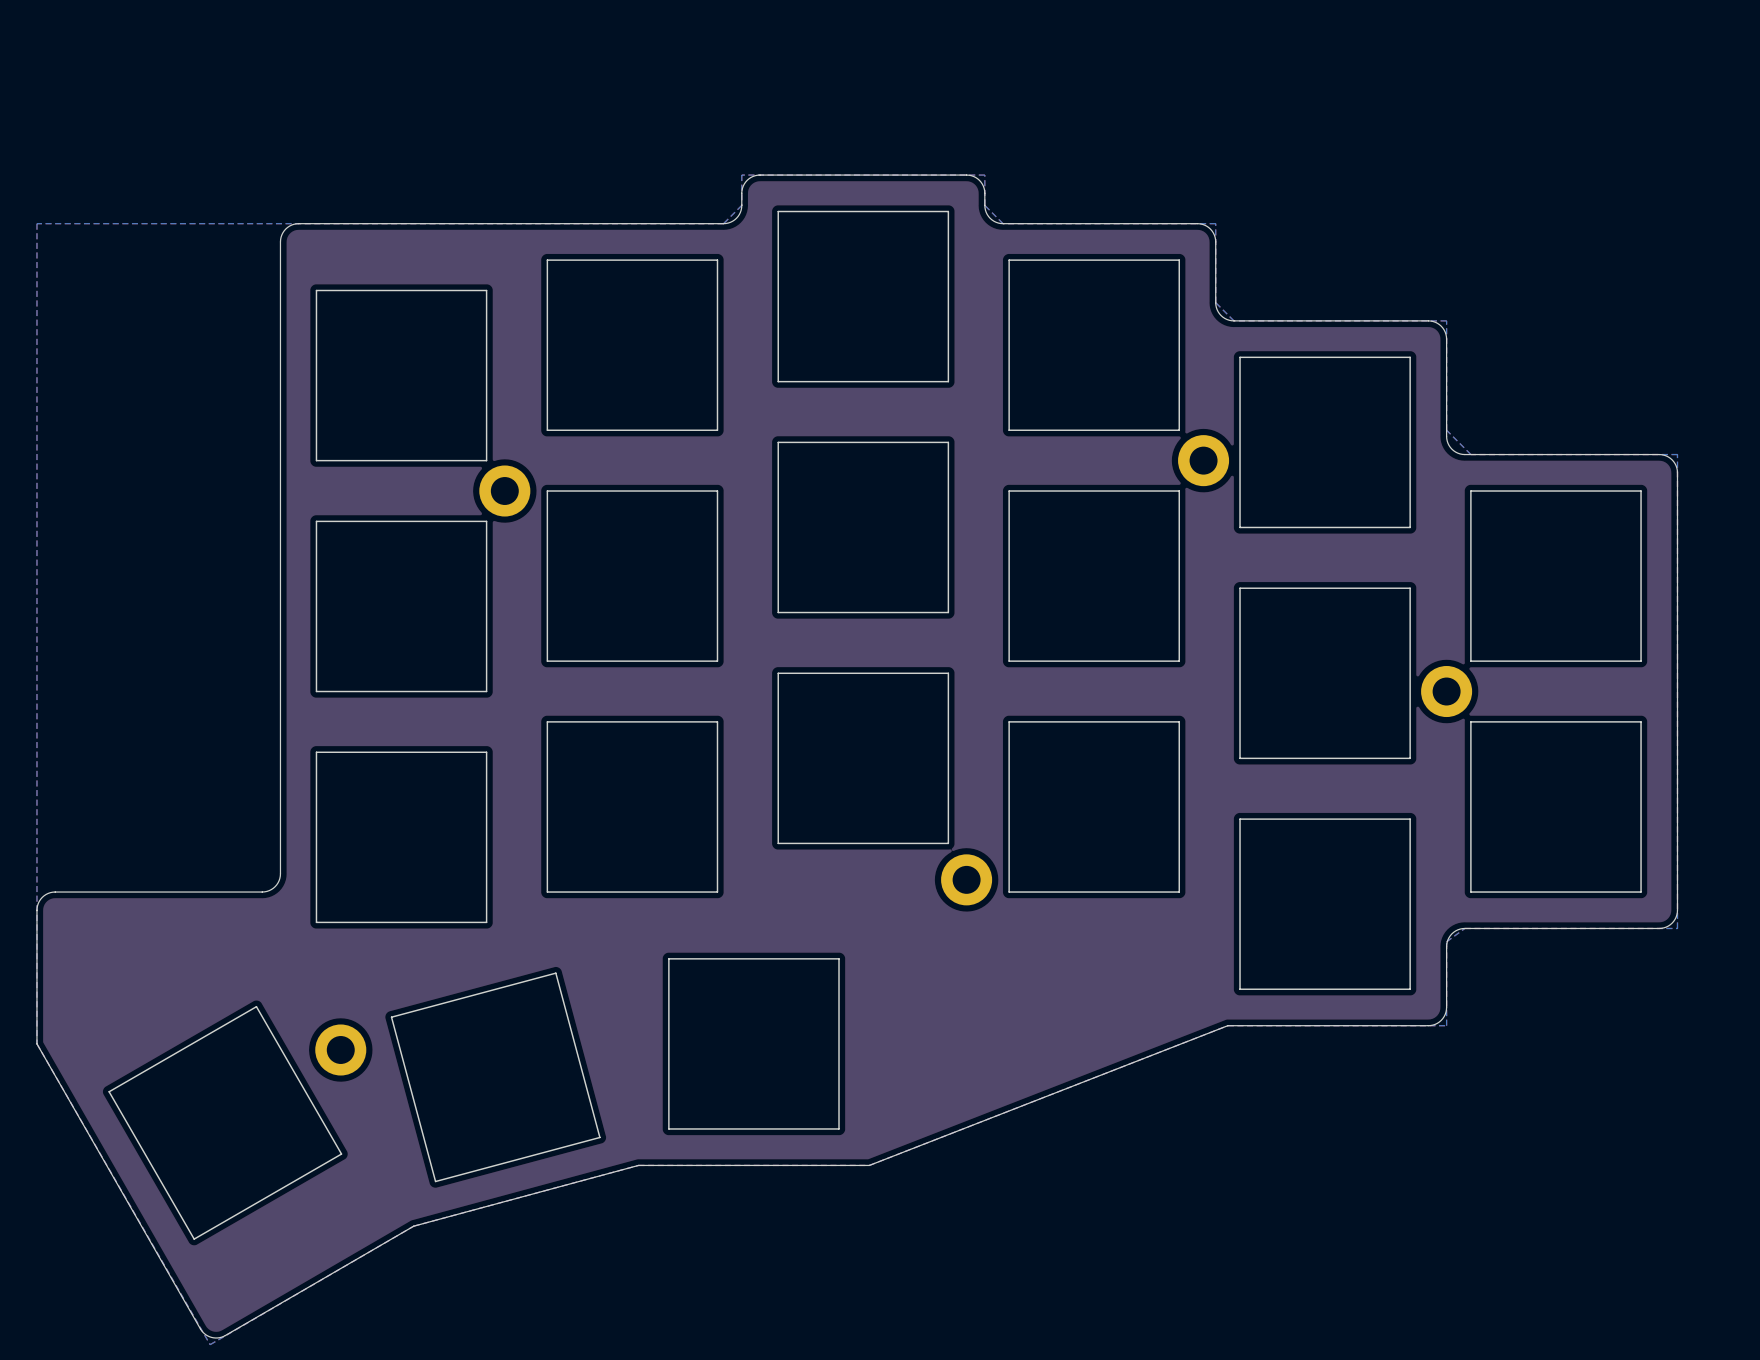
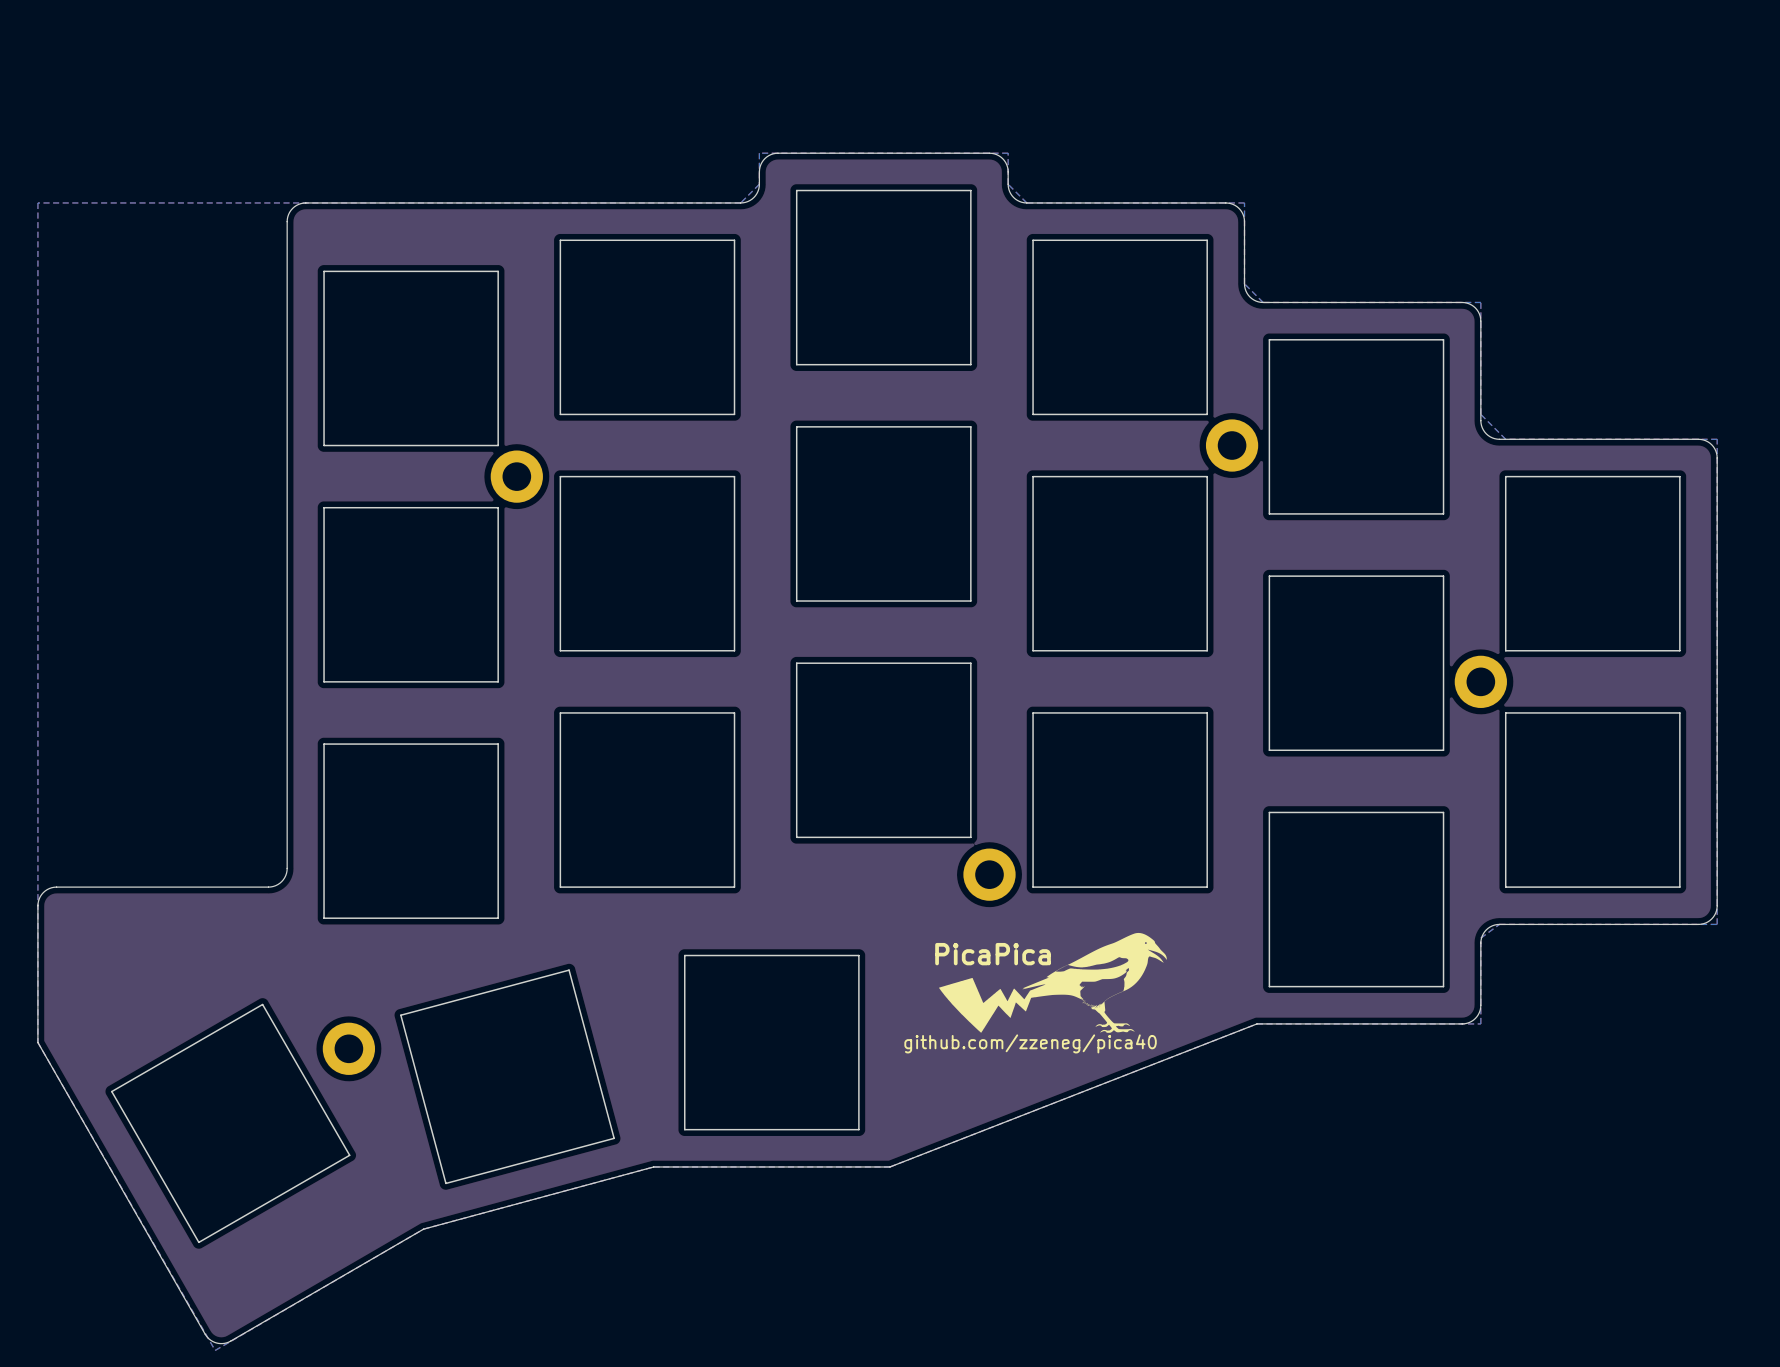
drawing: none -> [939, 932, 1167, 1033]
text: none -> PicaPica (993, 954)
text: none -> github.com/zzeneg/pica40 (1030, 1043)

